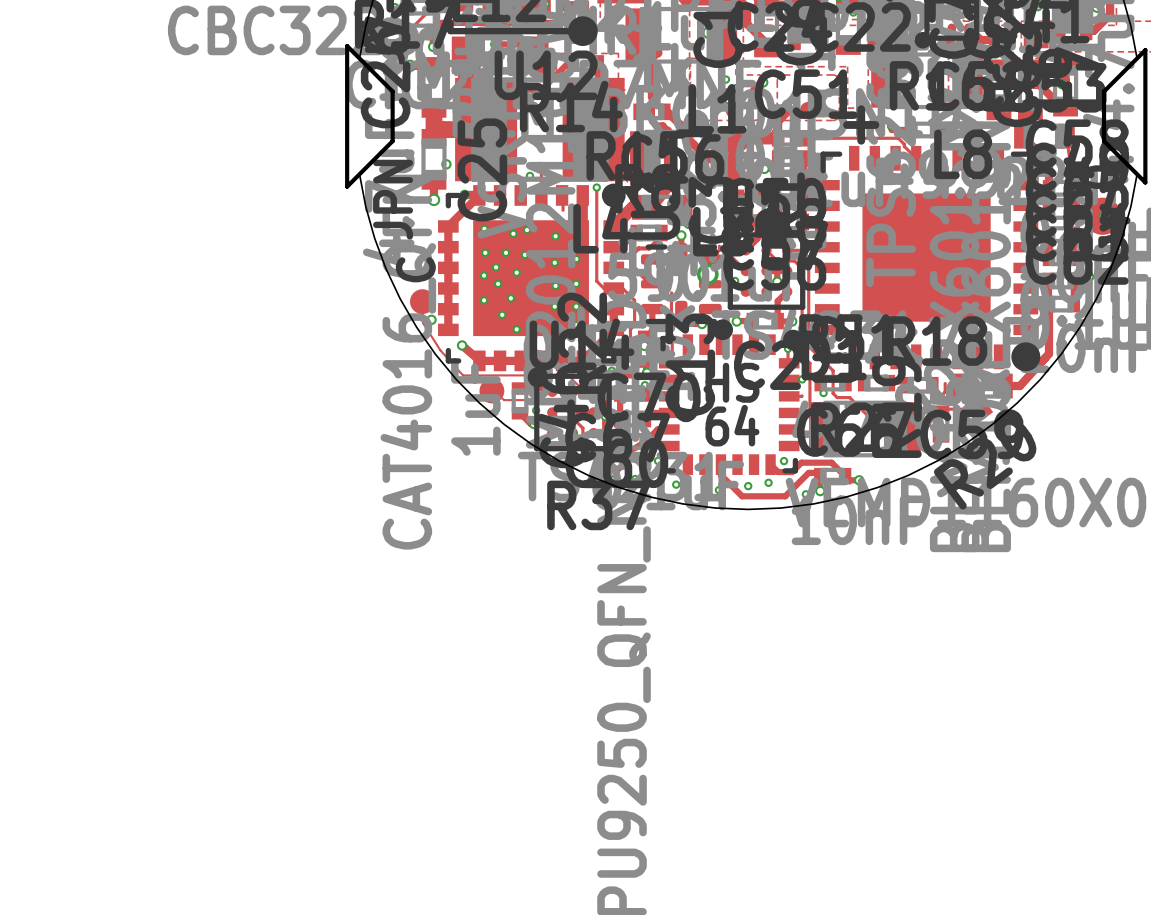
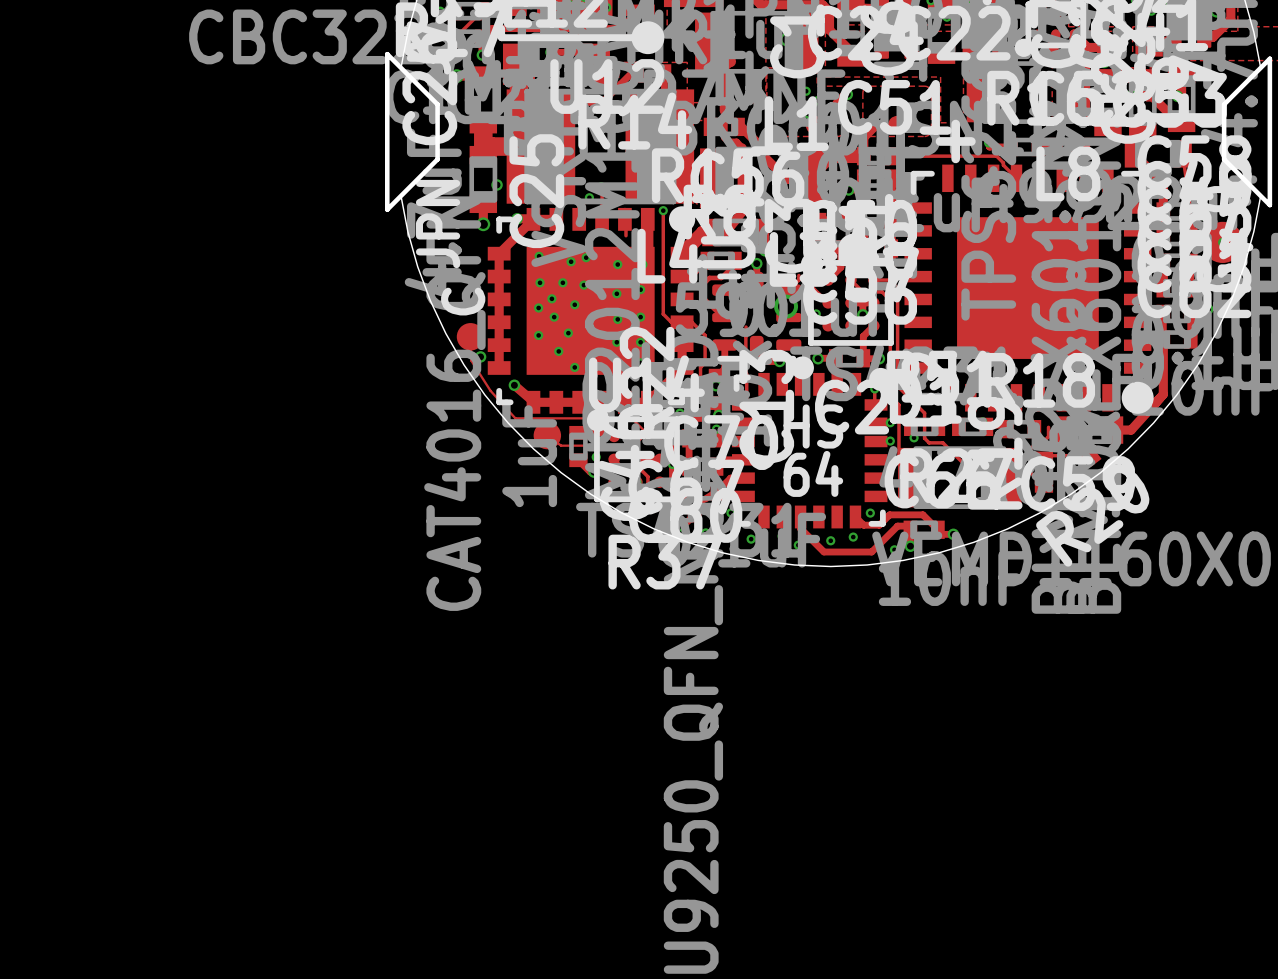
via: none -> (890, 441)

